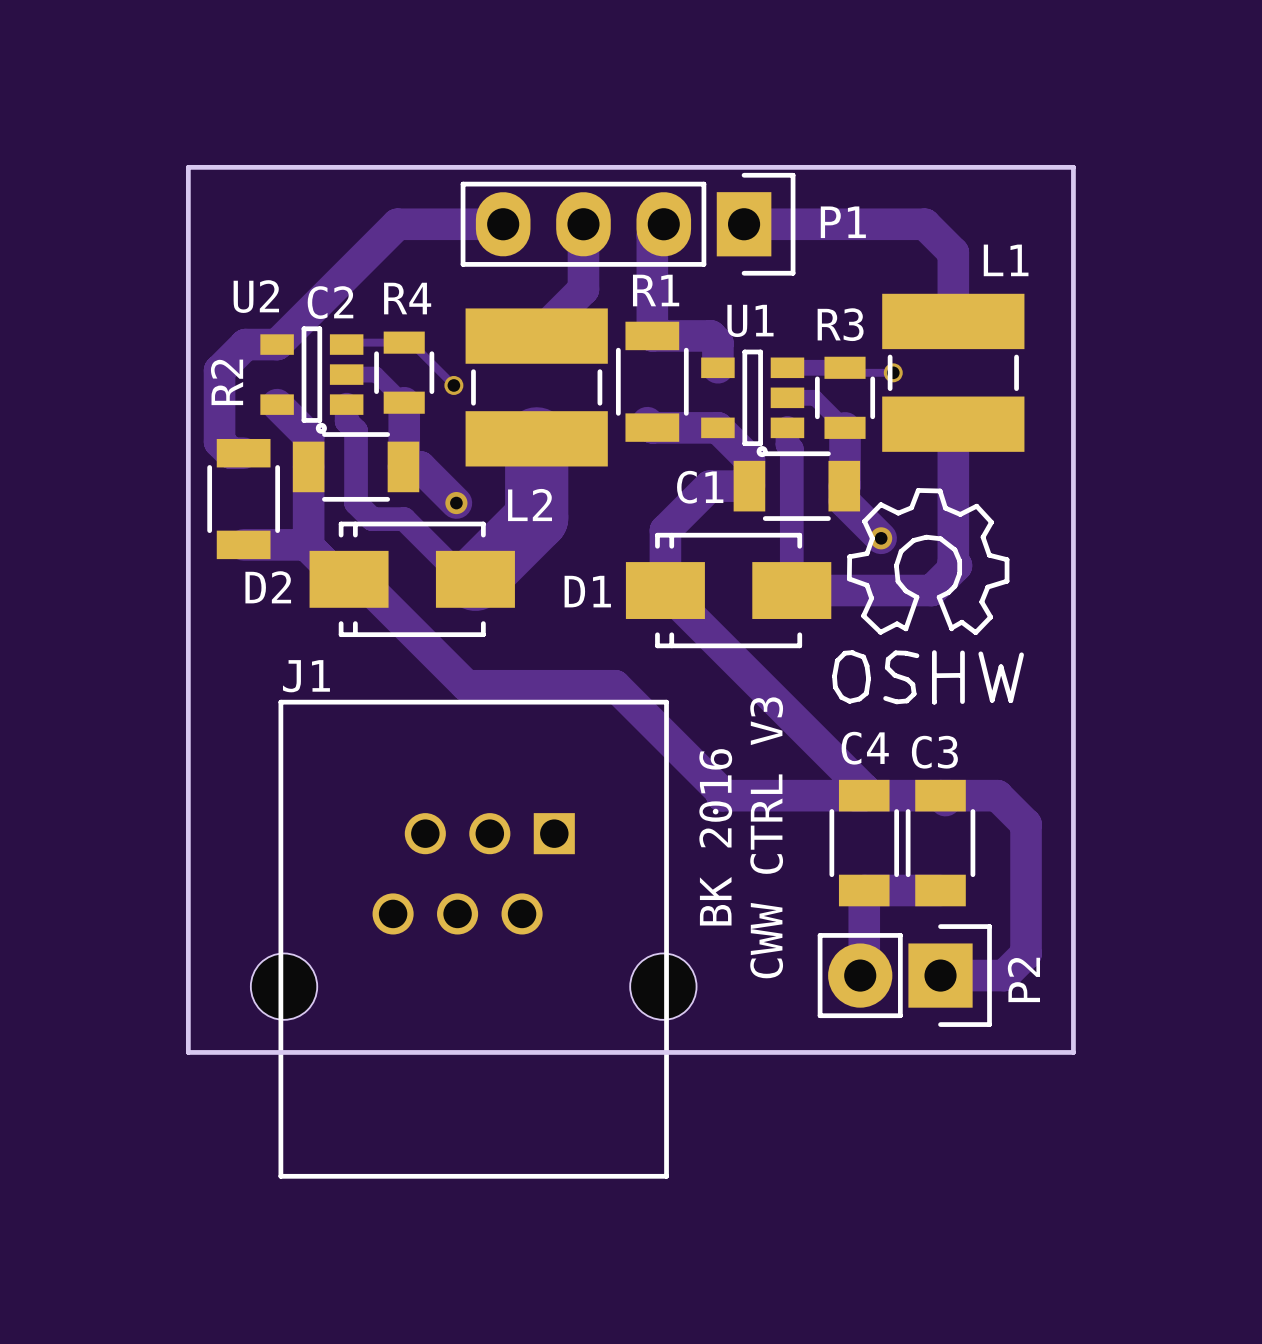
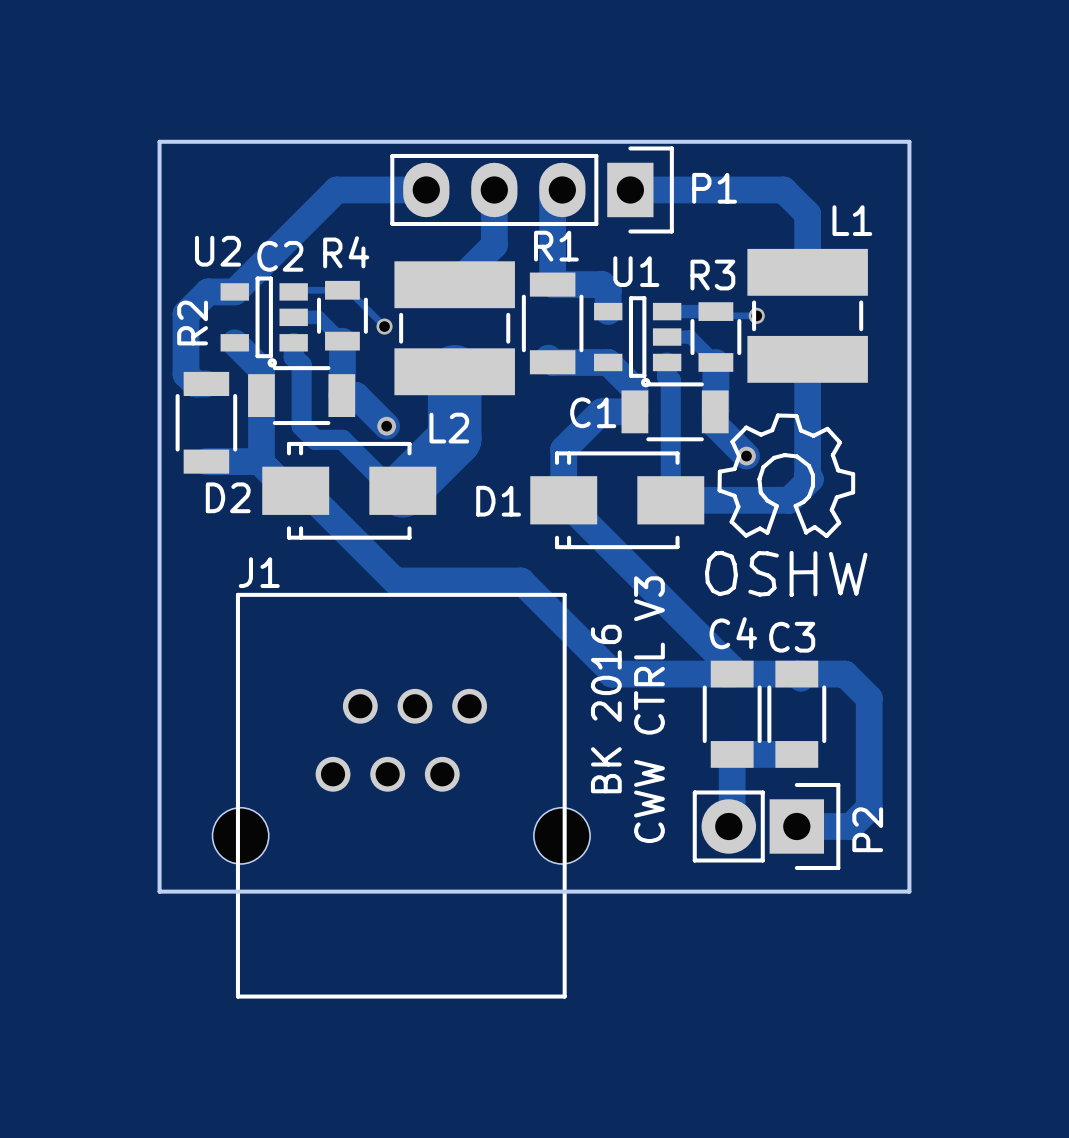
J1 footprint: [250, 699, 697, 1179] -> [212, 592, 591, 999]

